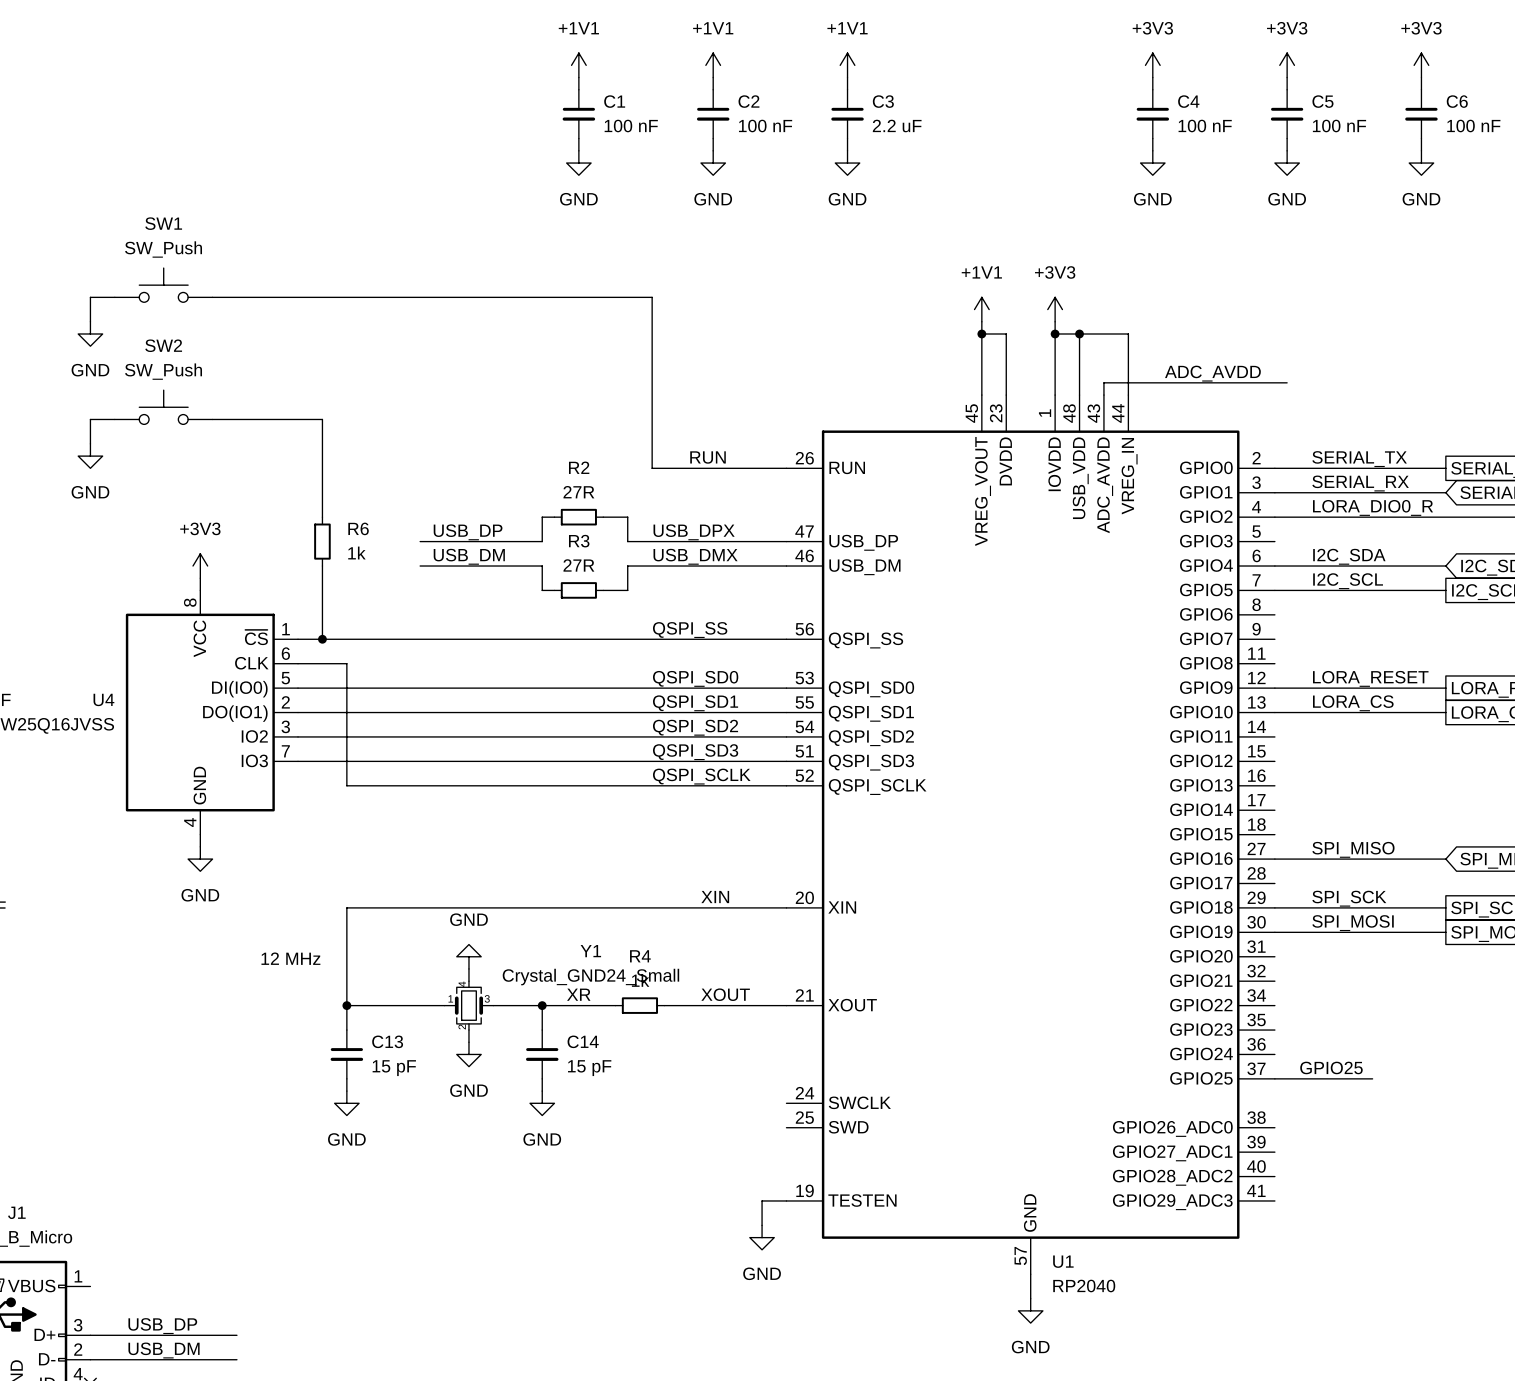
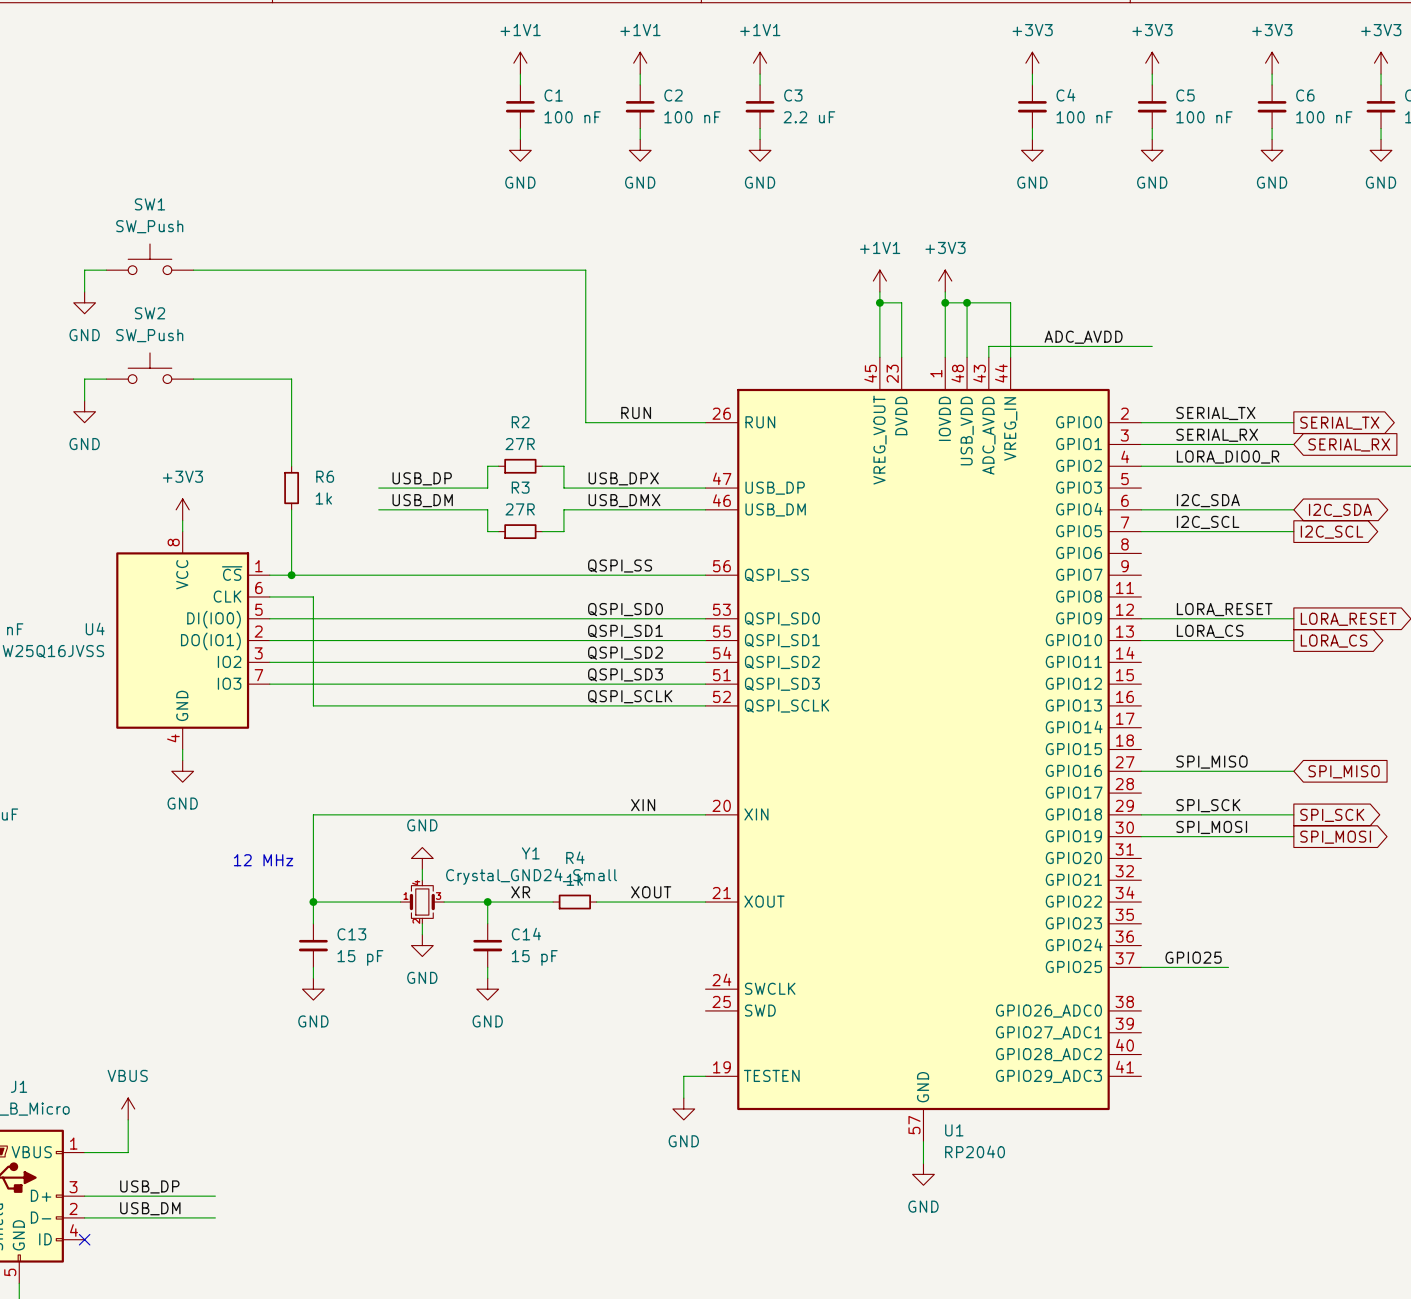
power symbol: none -> VBUS (128, 1109)
wire: none -> (128, 1119) (128, 1152) (84, 1152)

